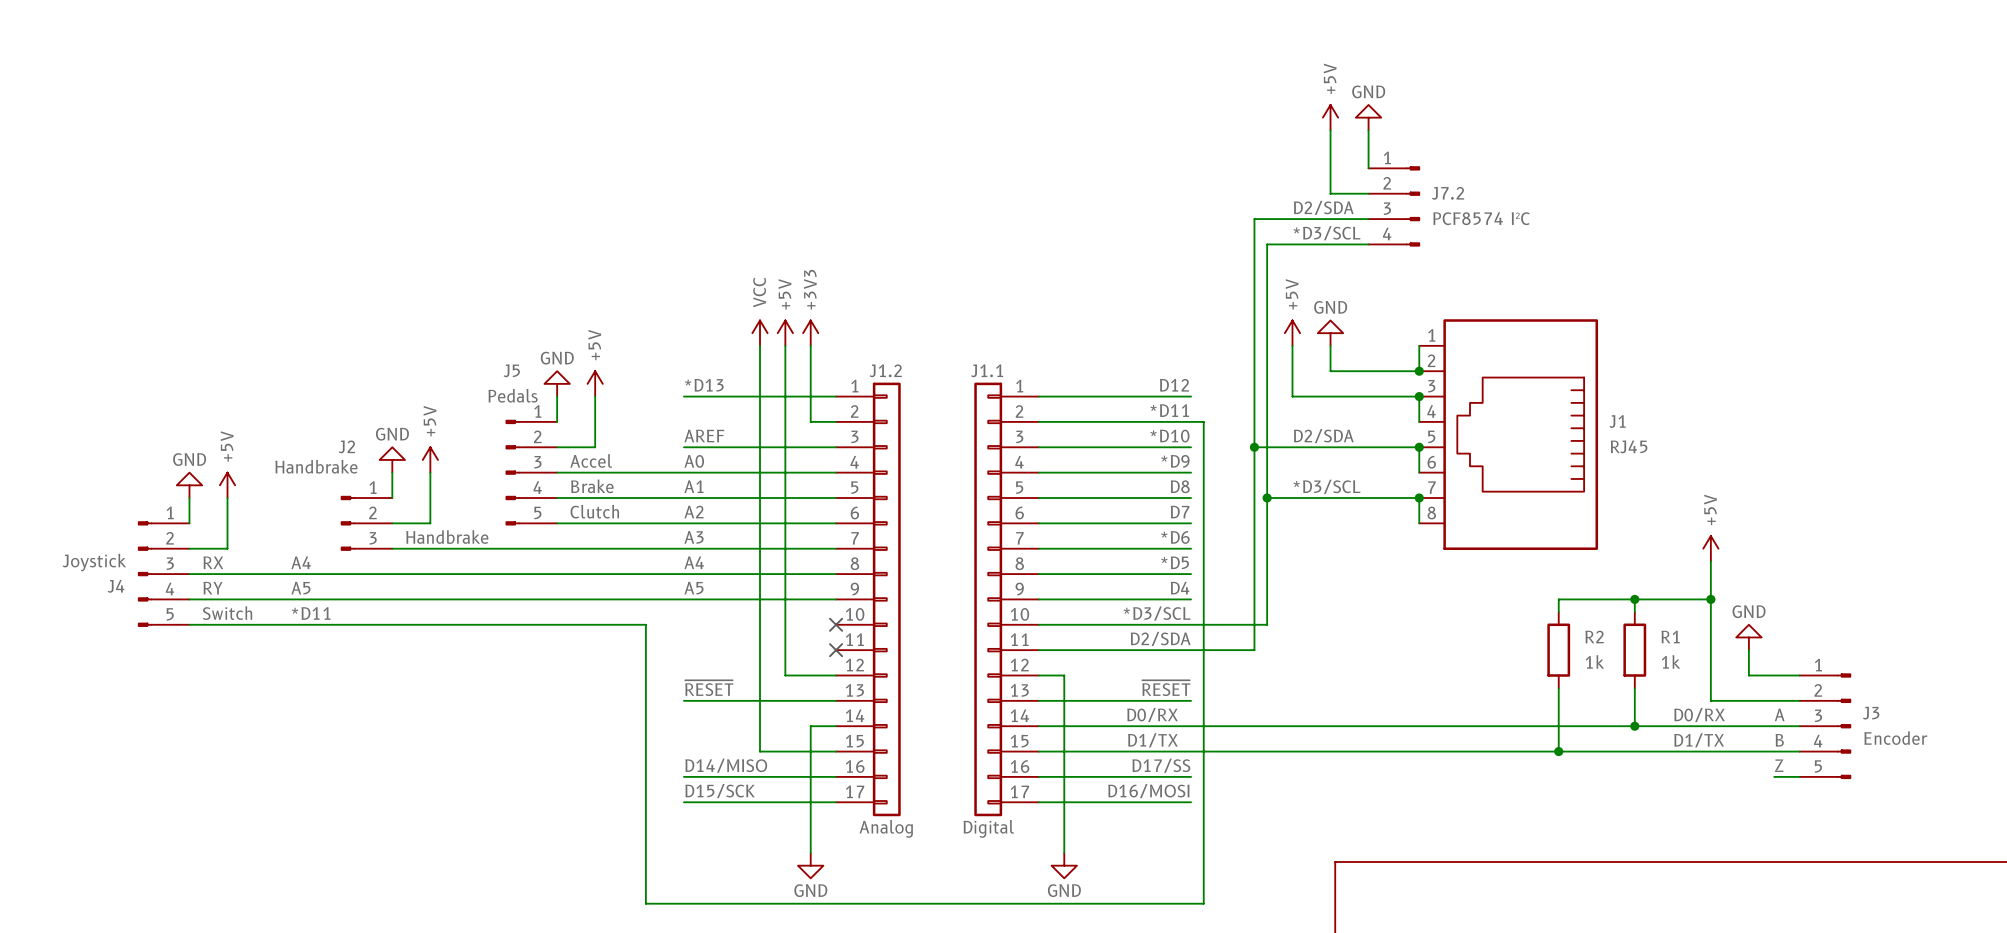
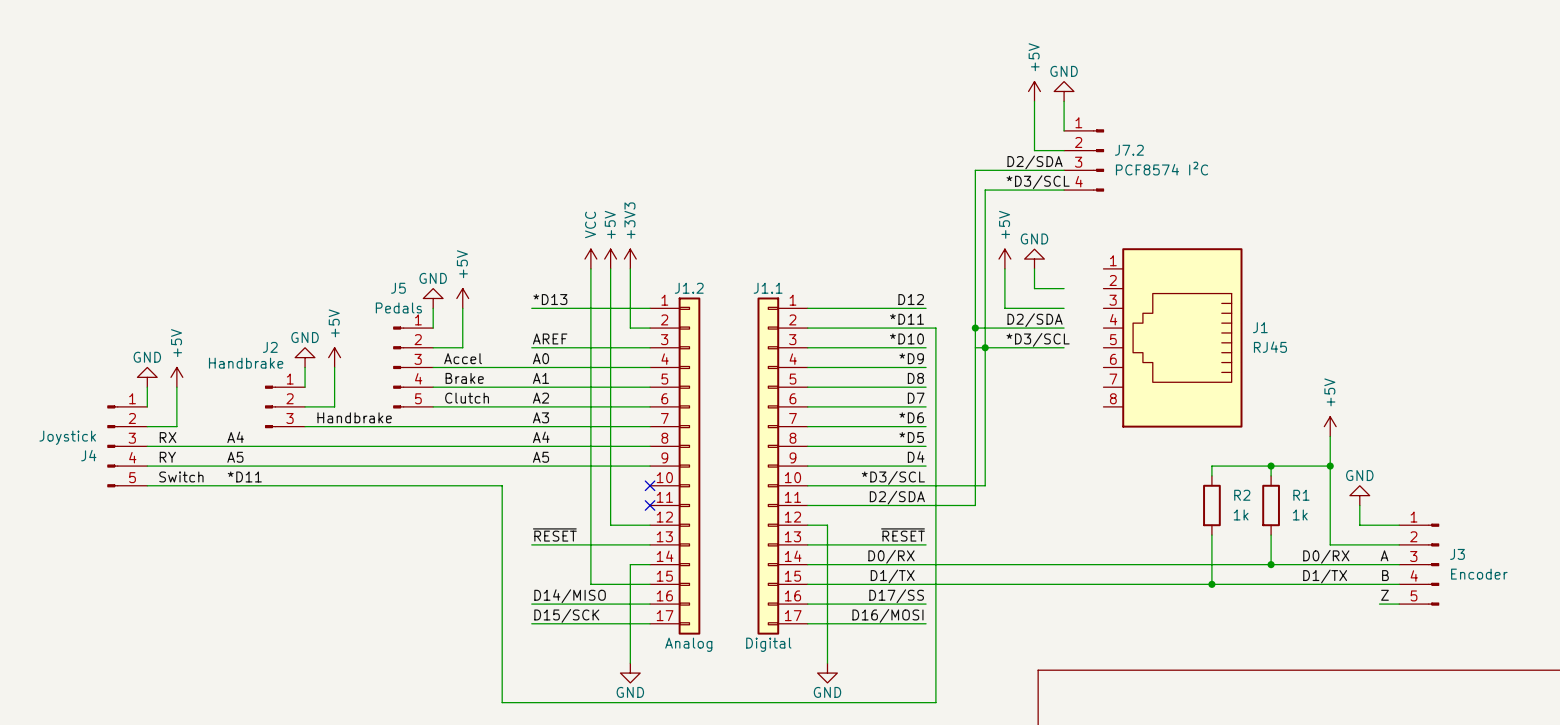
wire: (1419, 345) (1419, 371) (1368, 371) -> none
junction: (1419, 371) -> none
wire: (1368, 396) (1419, 396) (1419, 421) -> none
junction: (1419, 396) -> none
label: none -> D2/SDA (1035, 320)
wire: none -> (975, 328) (1064, 328)
junction: none -> (975, 328)
label: D2/SDA (1323, 436) -> *D3/SCL (1038, 339)
junction: (1254, 447) -> none
junction: none -> (985, 347)
wire: (1368, 447) (1419, 447) (1419, 472) -> none
junction: (1419, 447) -> none
label: *D3/SCL (1326, 486) -> none
wire: (1267, 498) (1419, 498) (1419, 523) -> none
junction: (1267, 498) -> none
junction: (1419, 498) -> none

